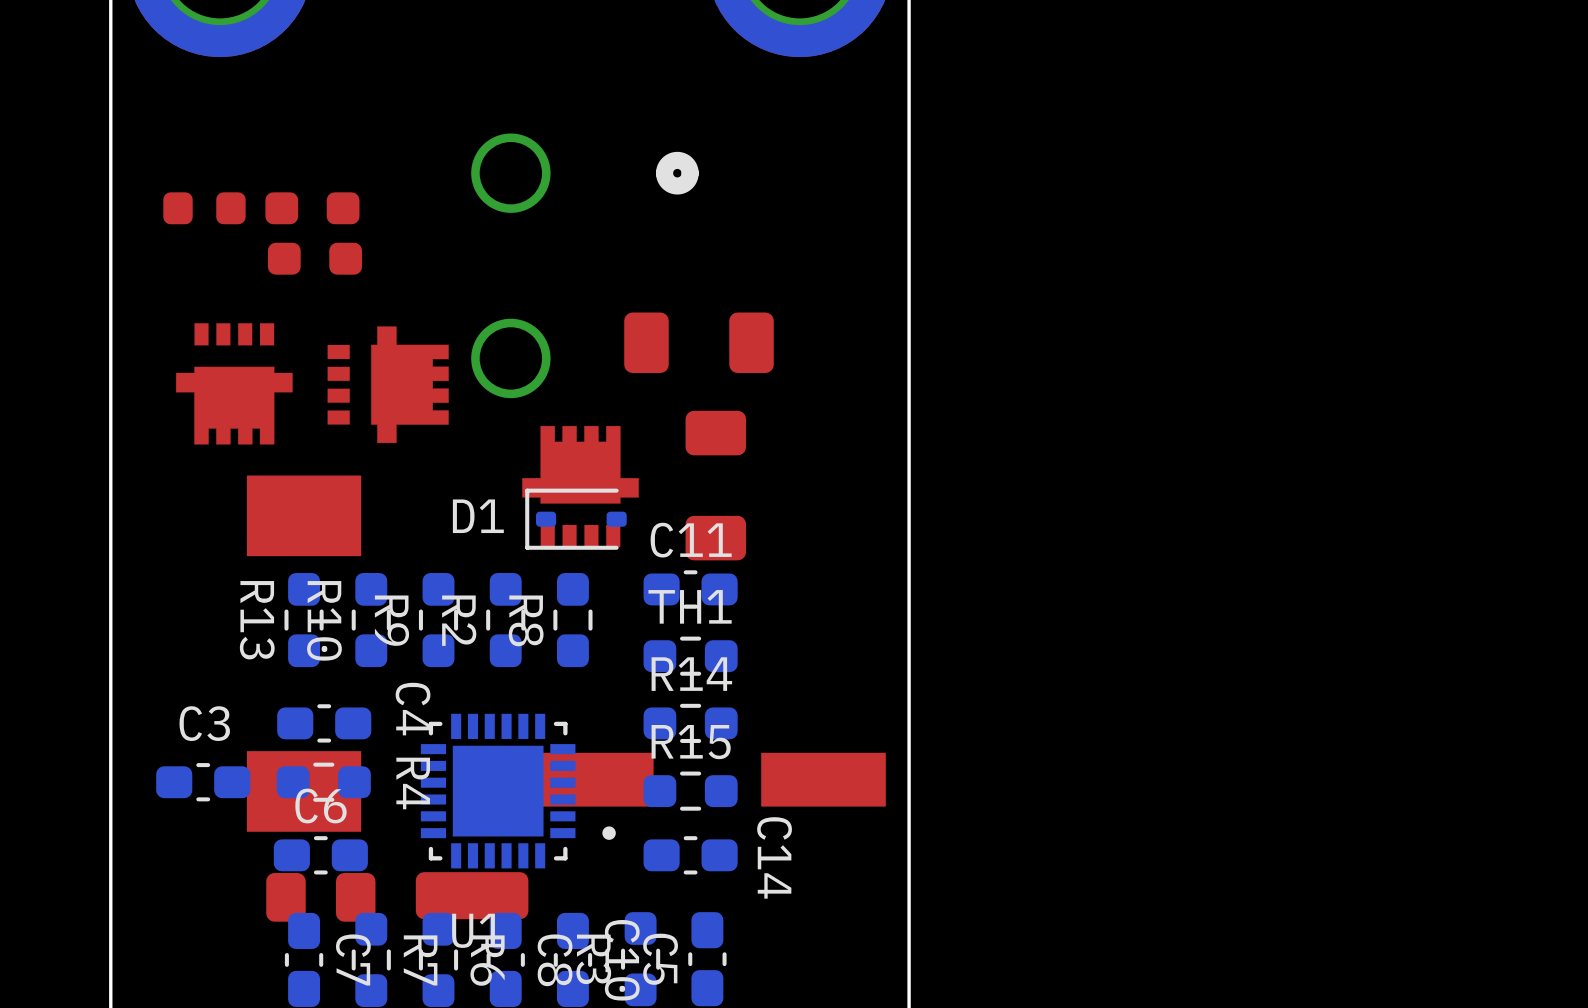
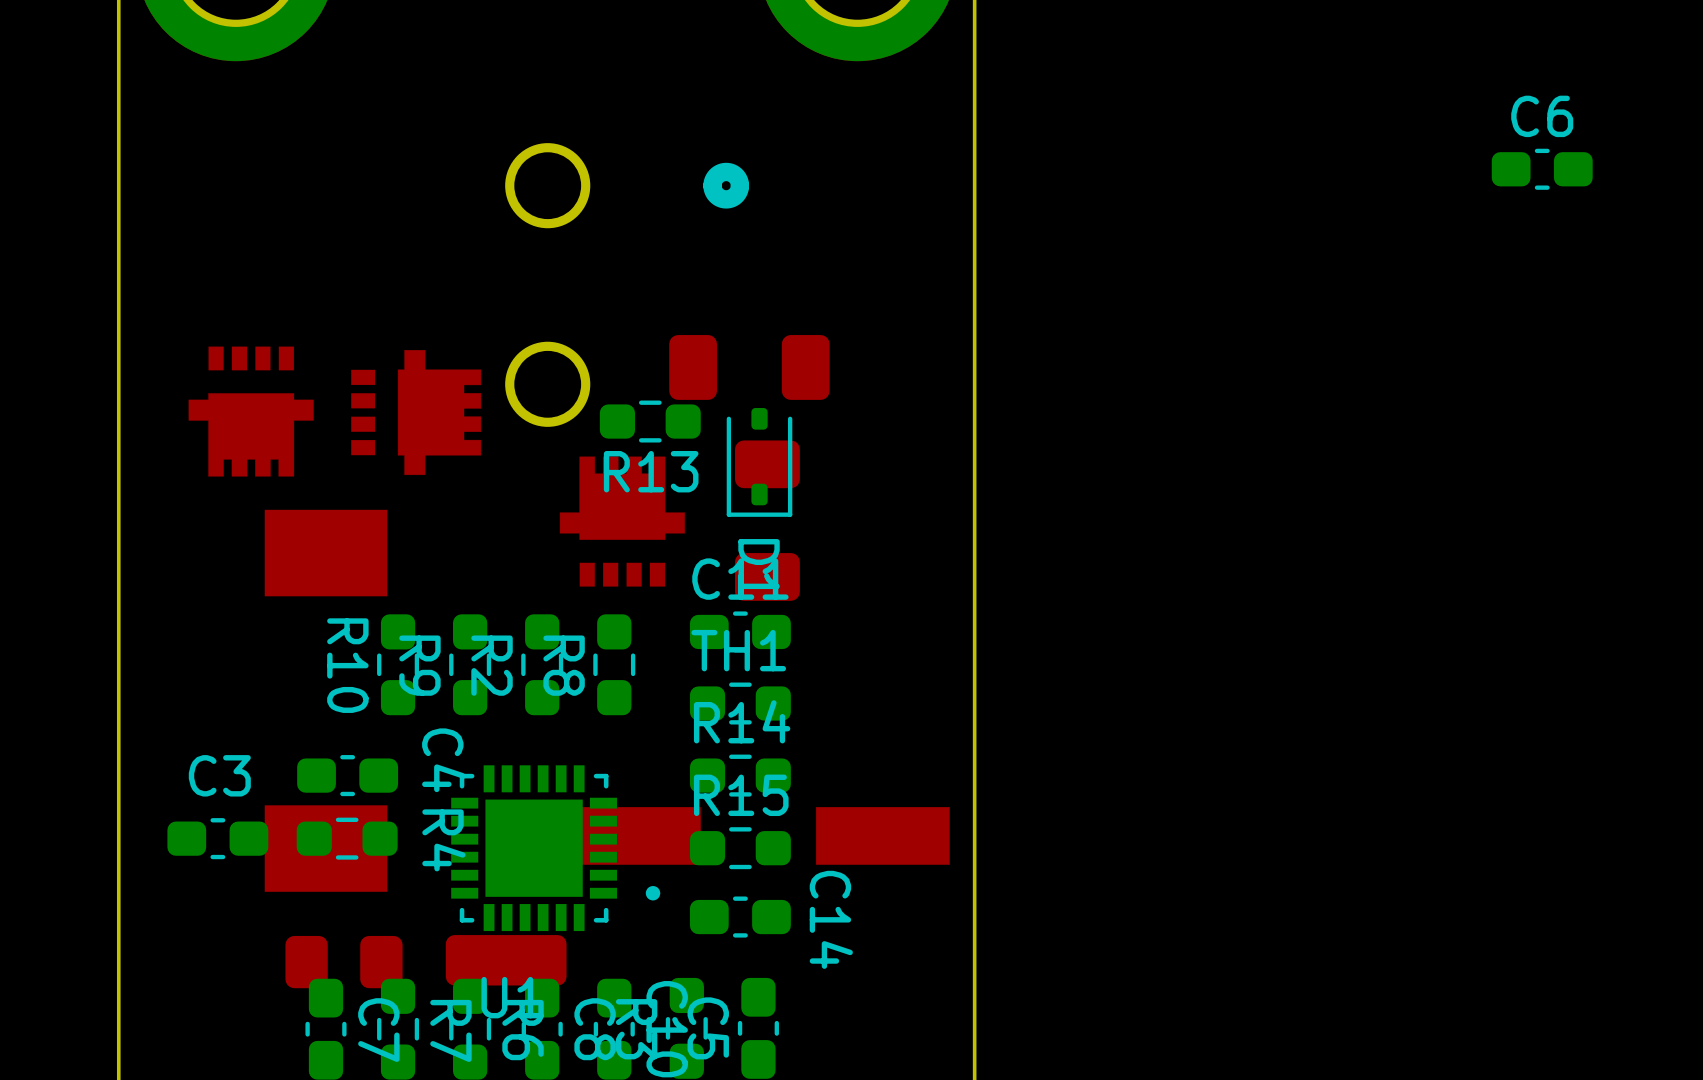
part: (204, 208) -> none
part: (312, 208) -> none
part: (314, 258) -> none
D1 rotation: 0° (575, 519) -> 90° counterclockwise (759, 462)
D1 position: (575, 519) -> (759, 462)
R13 name position: R13 (257, 620) -> R13 (651, 471)
R13 rotation: 0° (304, 620) -> 90° clockwise (650, 421)
R13 position: (304, 620) -> (650, 421)
C6 position: (320, 855) -> (1542, 169)

